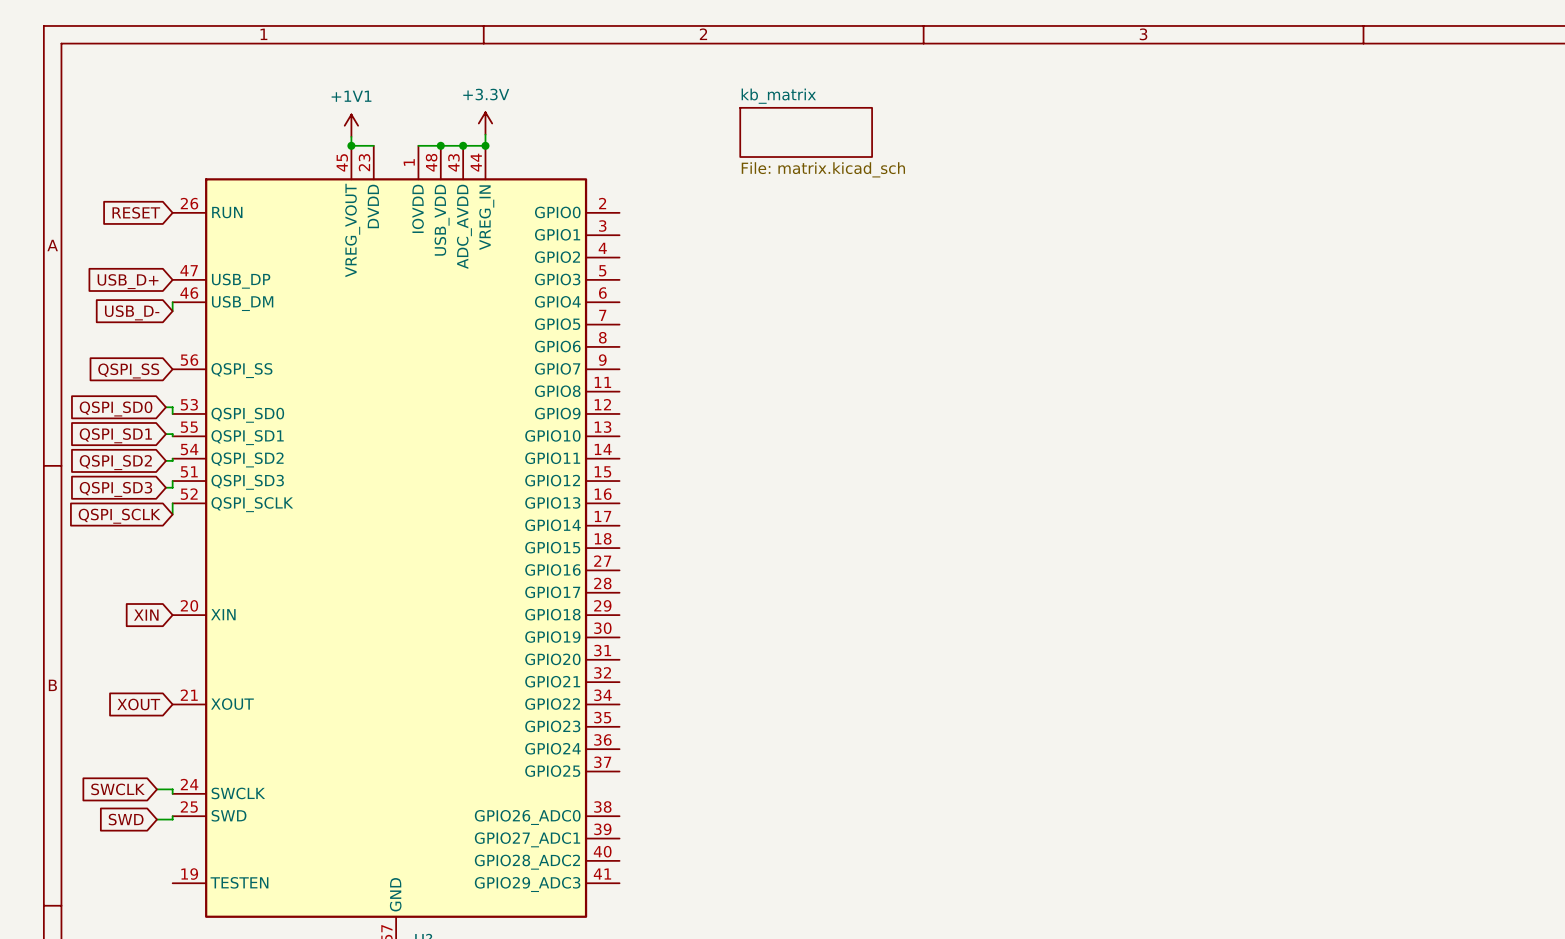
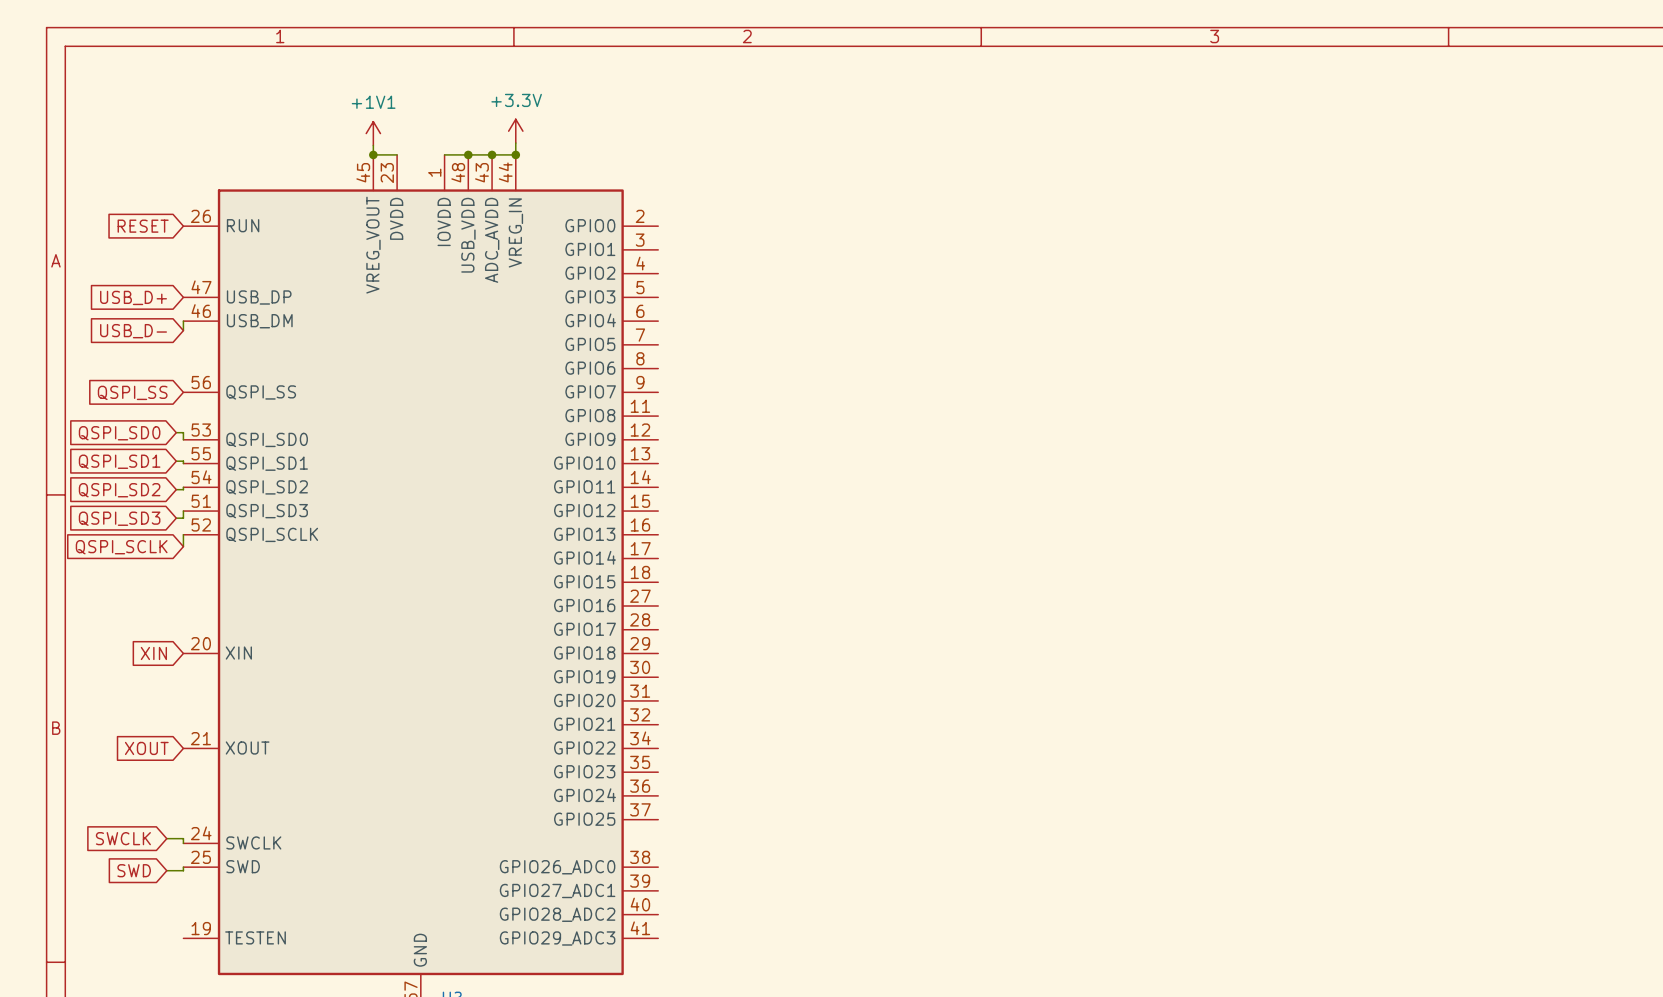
sheet kb_matrix: File: matrix.kicad_sch (806, 132) -> none

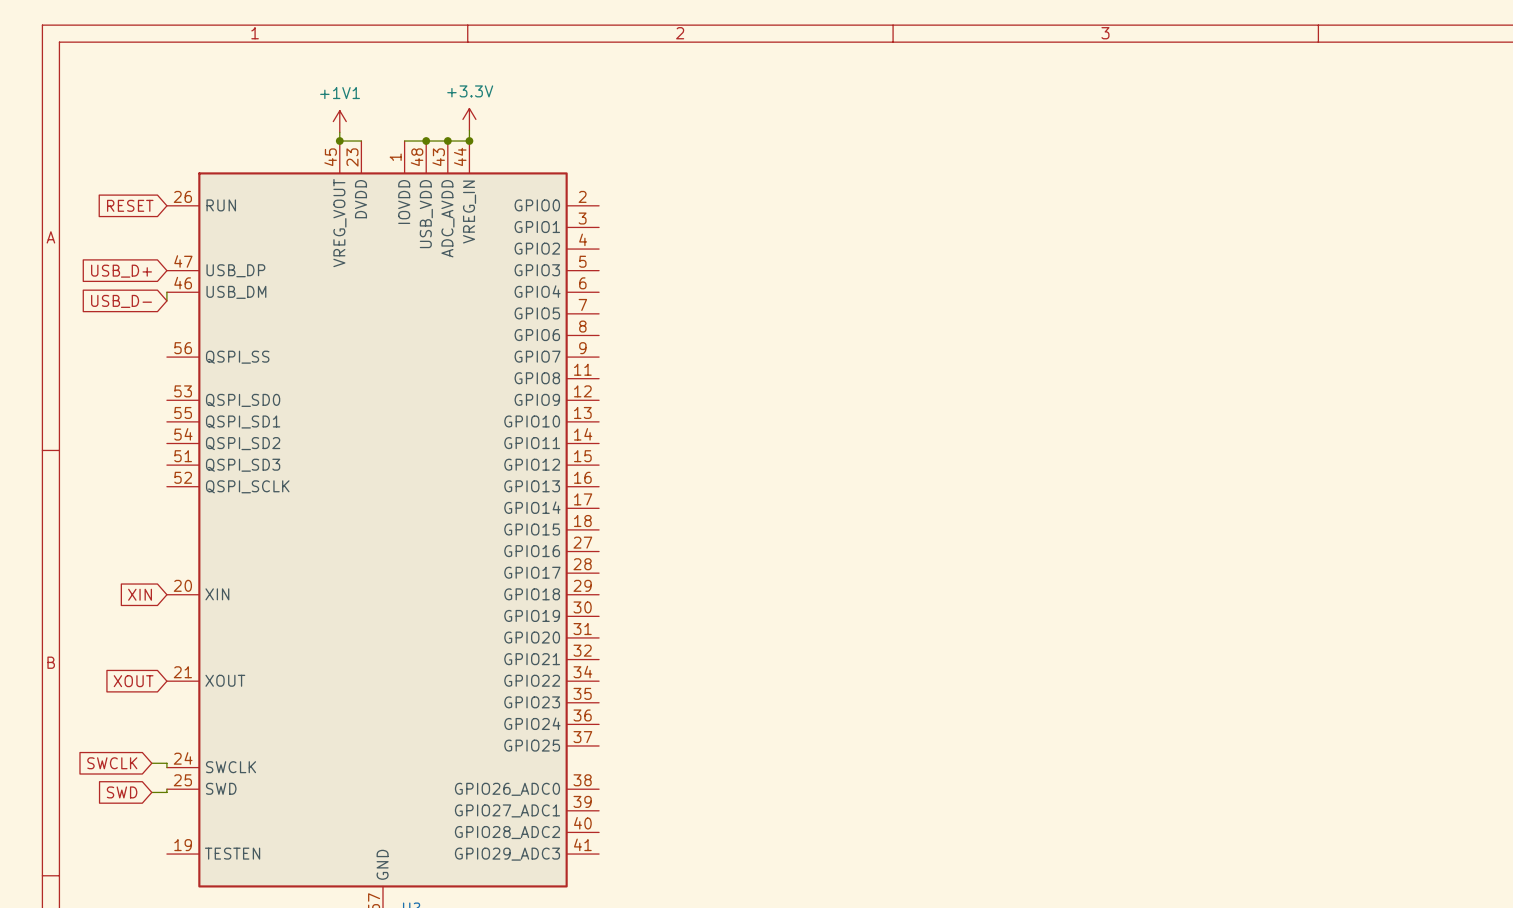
global label: QSPI_SS (132, 392) -> none
wire: (176, 432) (183, 432) (183, 439) -> none
global label: QSPI_SD0 (119, 433) -> none
global label: QSPI_SD1 (119, 461) -> none
wire: (176, 461) (183, 461) (183, 463) -> none
wire: (183, 487) (183, 489) (176, 489) -> none
global label: QSPI_SD2 (119, 490) -> none
wire: (183, 511) (183, 518) (176, 518) -> none
global label: QSPI_SD3 (119, 518) -> none
wire: (183, 534) (183, 546) -> none
global label: QSPI_SCLK (121, 547) -> none

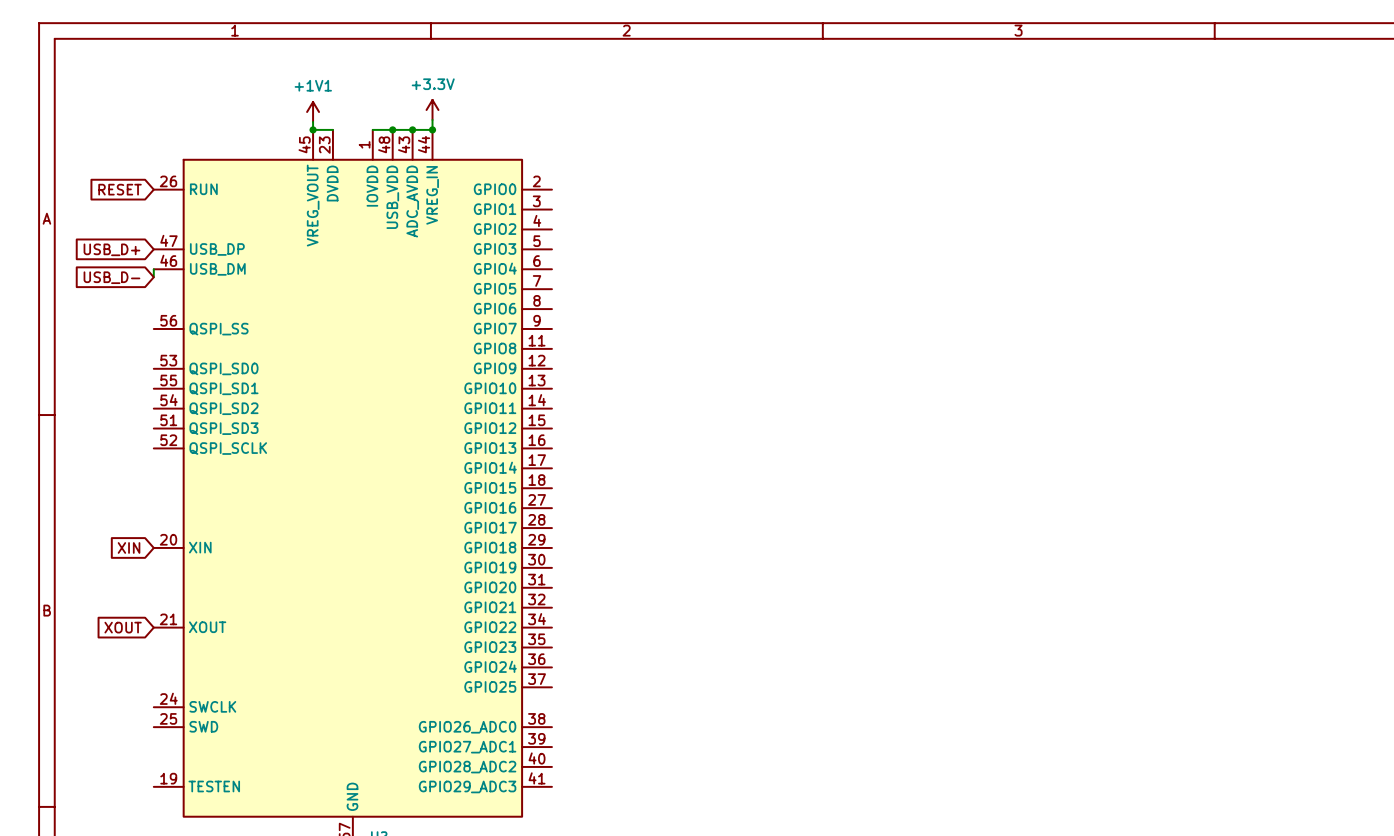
global label: SWCLK (112, 763) -> none
wire: (151, 763) (166, 763) (166, 767) -> none
wire: (166, 789) (166, 792) (151, 792) -> none
global label: SWD (122, 792) -> none

